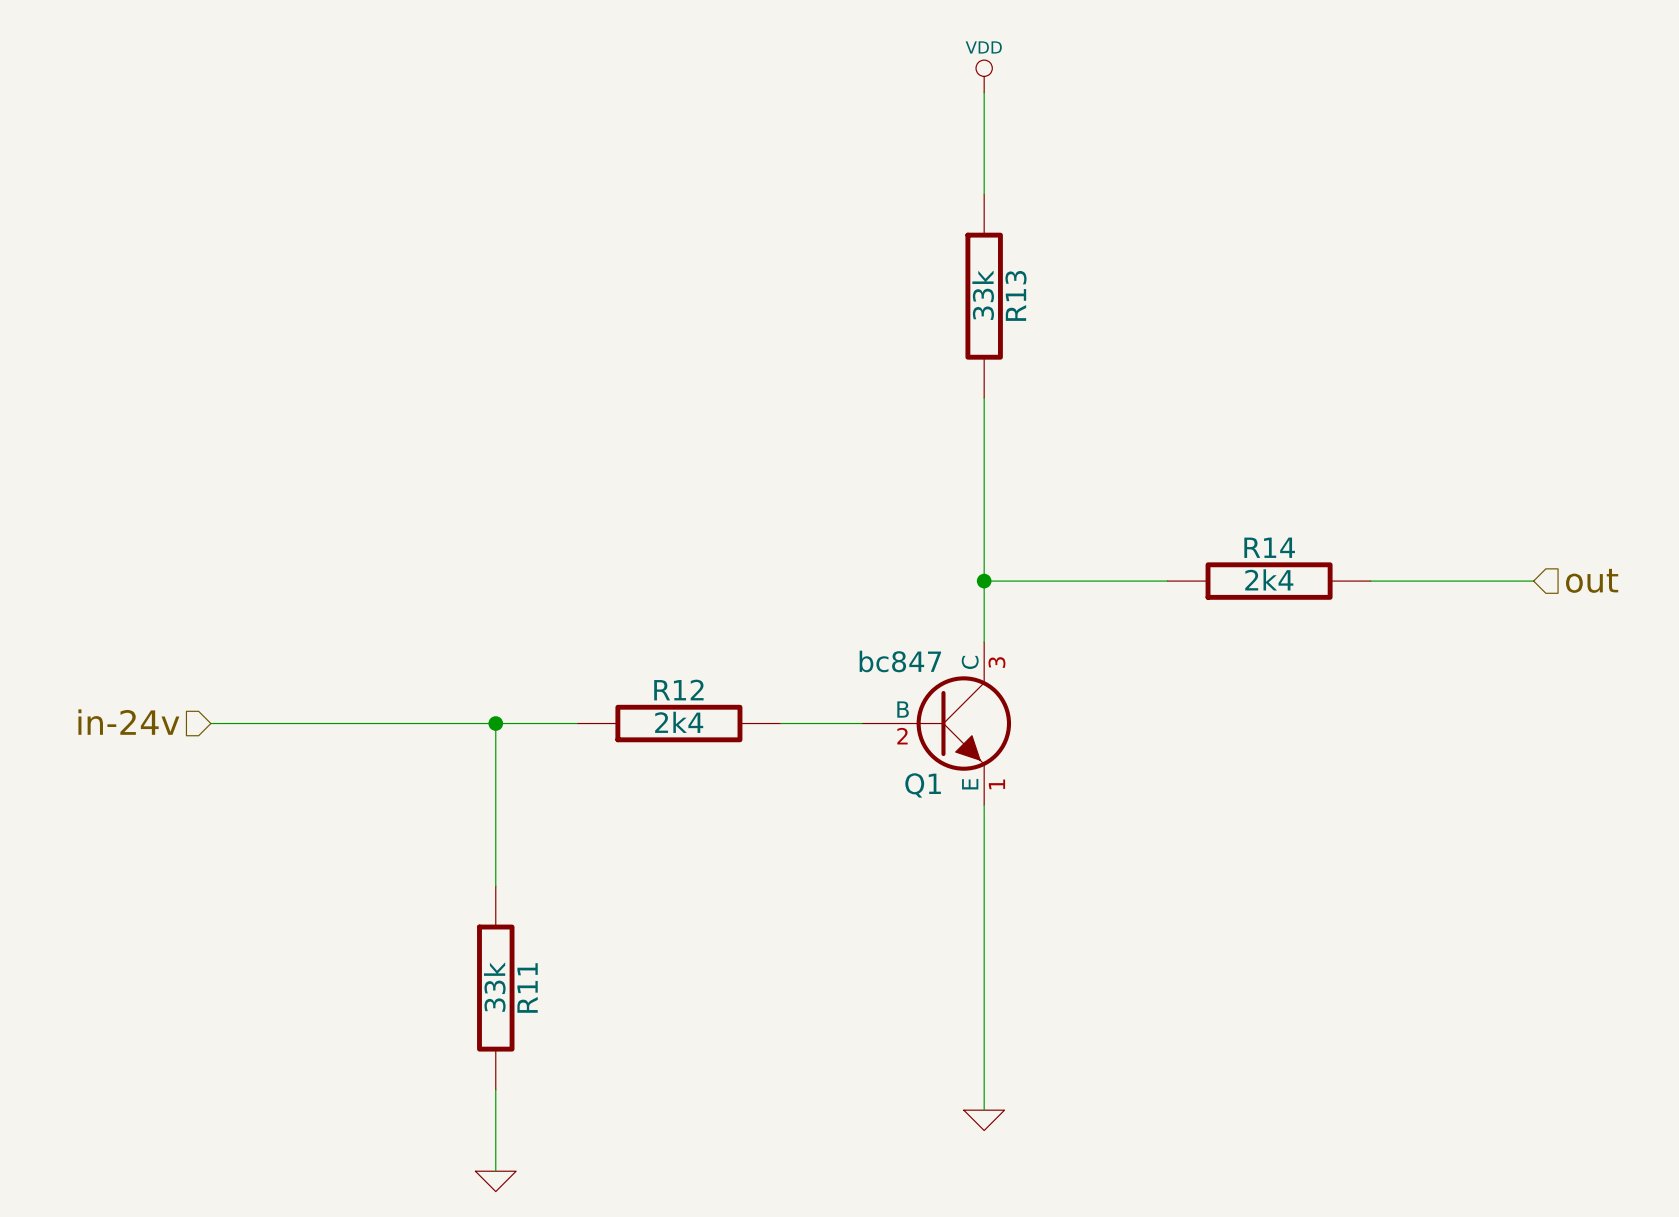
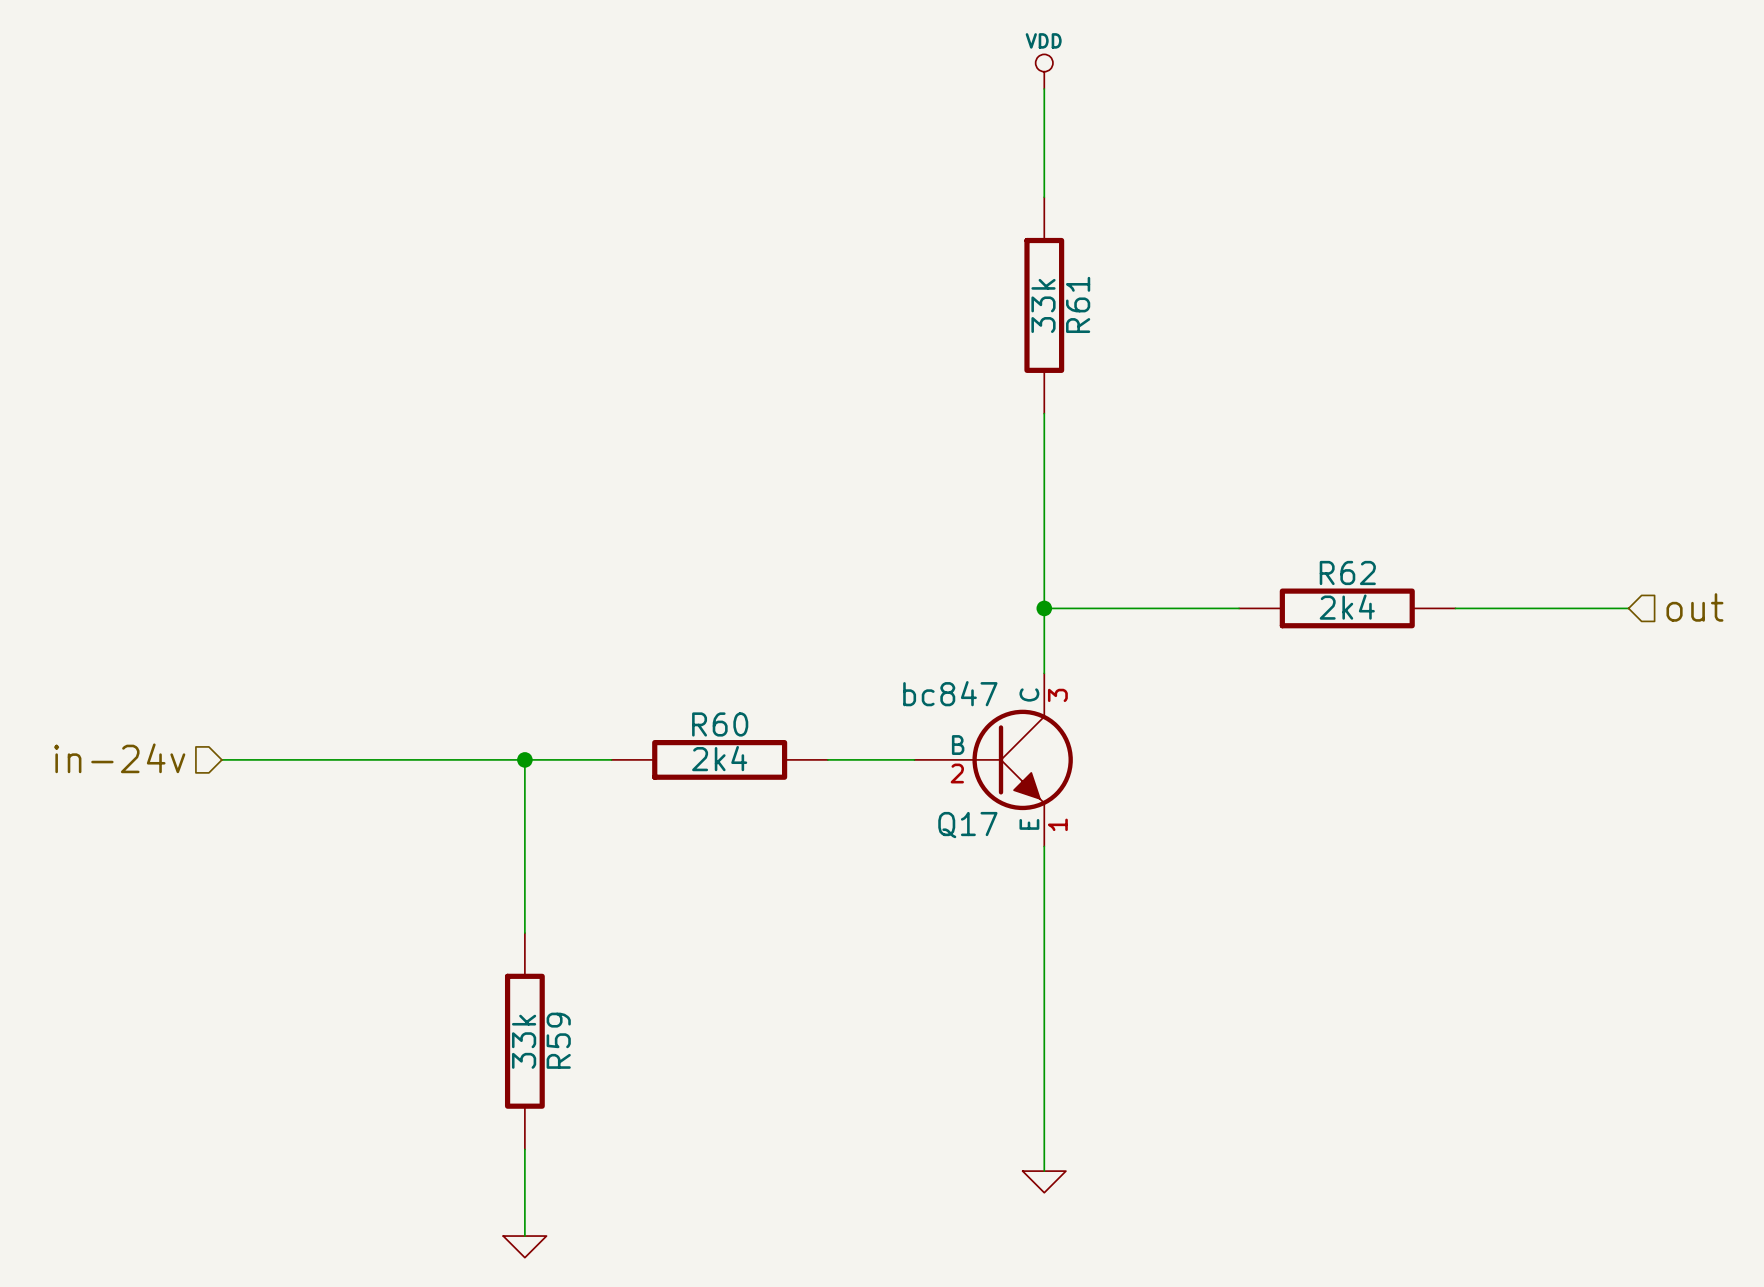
R13 name: R13 (1015, 295) -> R61 (1078, 304)
R14 name: R14 (1269, 547) -> R62 (1347, 572)
R12 name: R12 (678, 690) -> R60 (720, 724)
Q1 name: Q1 (923, 785) -> Q17 (967, 825)
R11 name: R11 (527, 987) -> R59 (558, 1040)

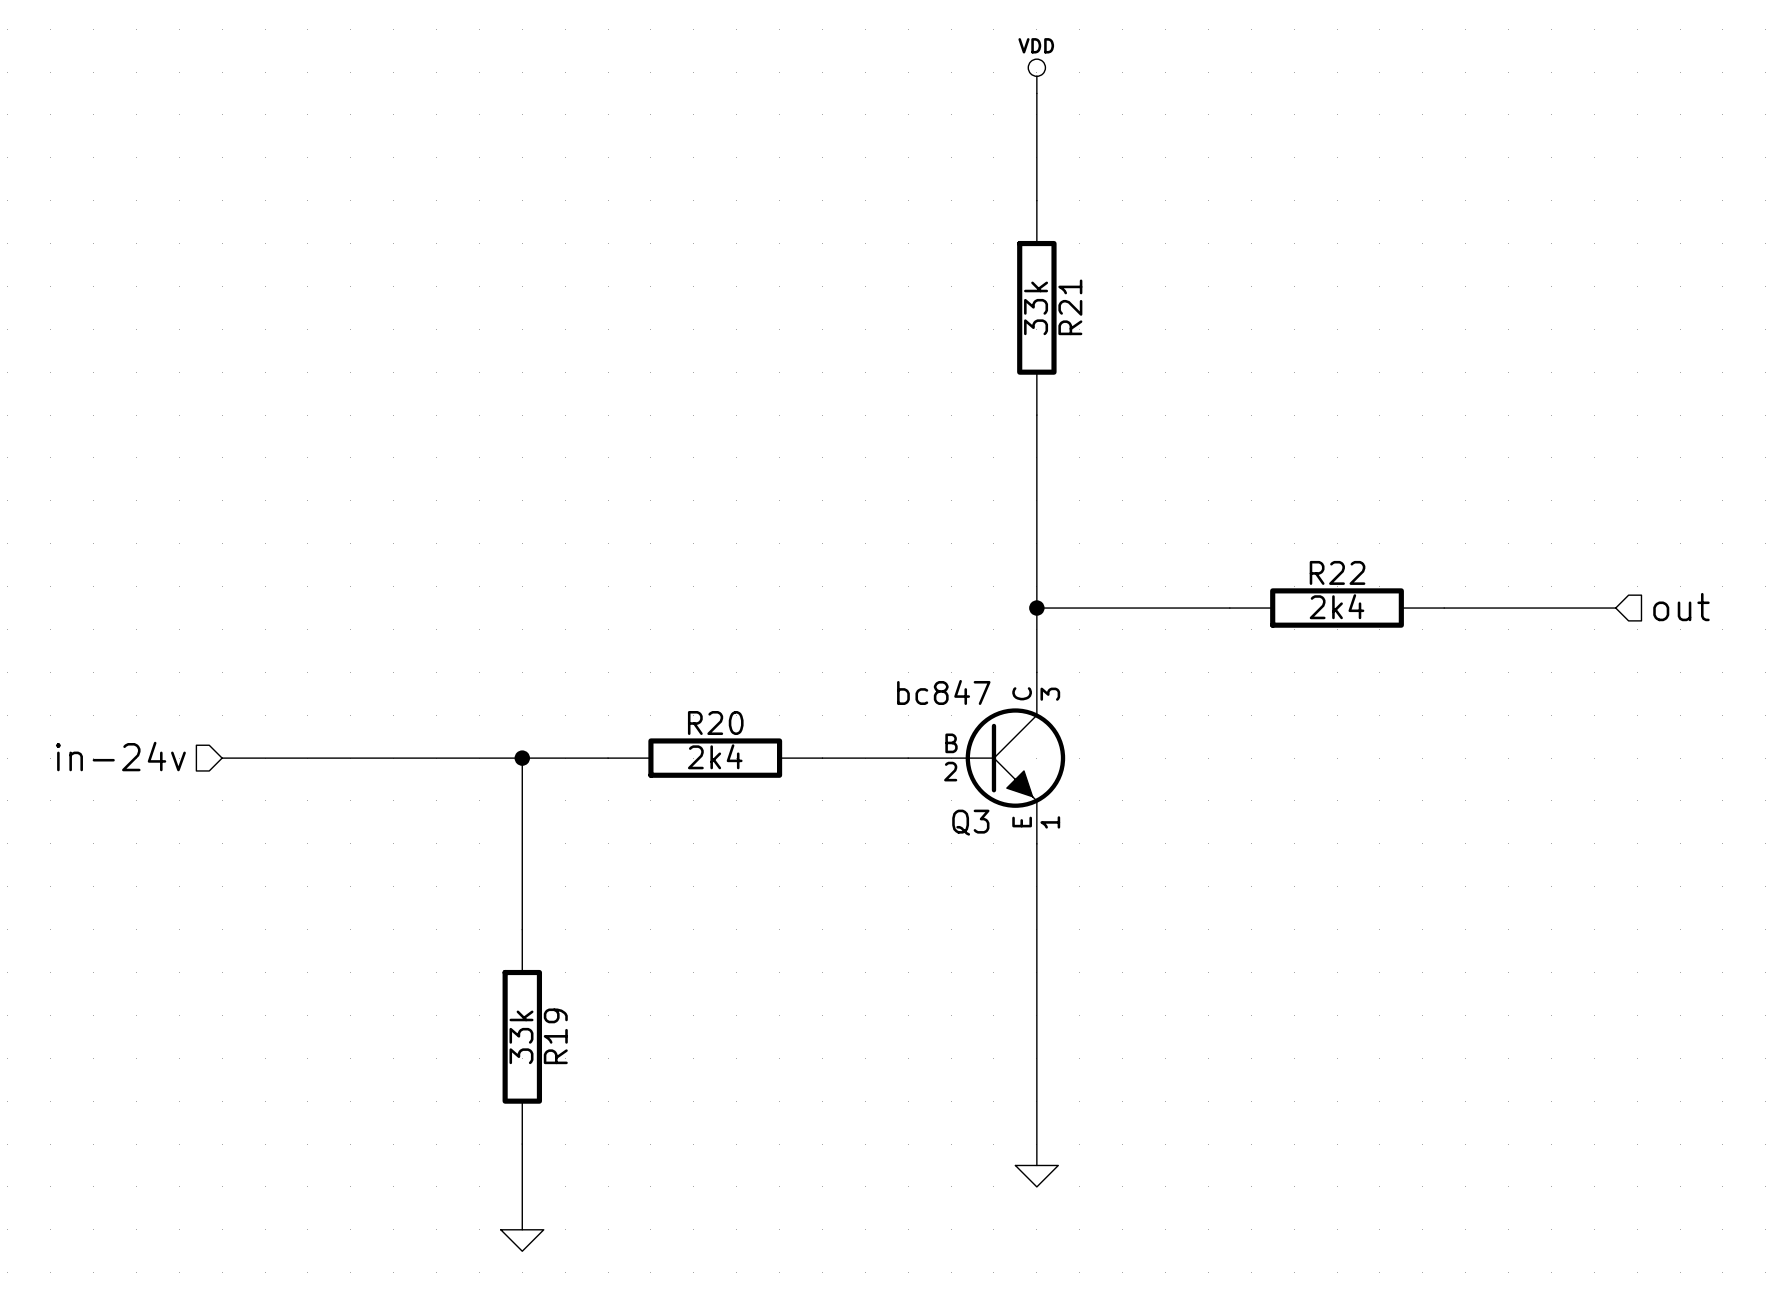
R61 name: R61 (1078, 304) -> R21 (1070, 307)
R62 name: R62 (1347, 572) -> R22 (1337, 572)
R60 name: R60 (720, 724) -> R20 (715, 723)
Q17 name: Q17 (967, 825) -> Q3 (970, 822)
R59 name: R59 (558, 1040) -> R19 (555, 1036)

